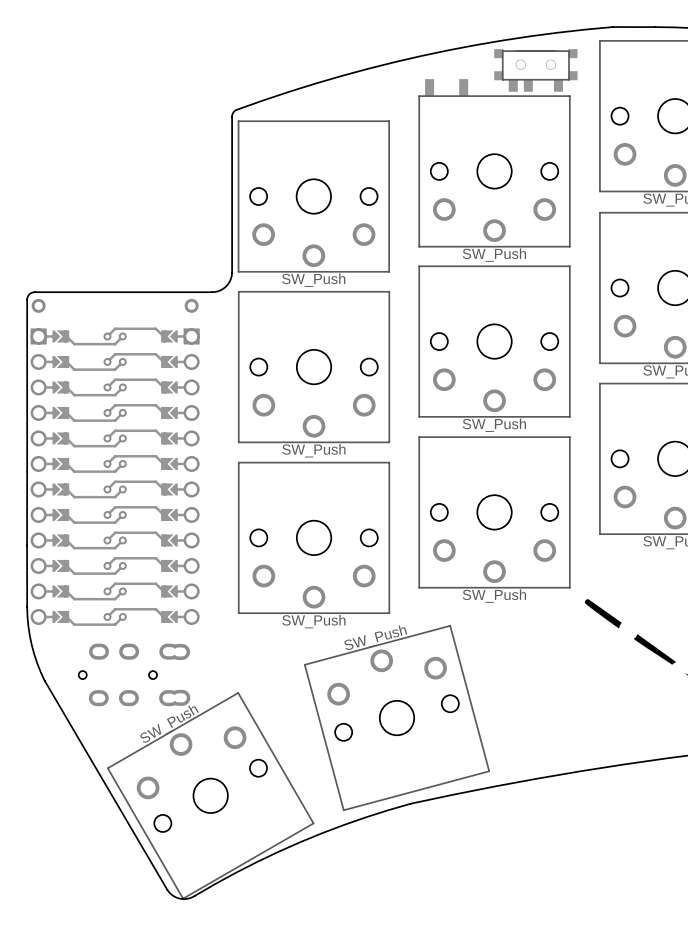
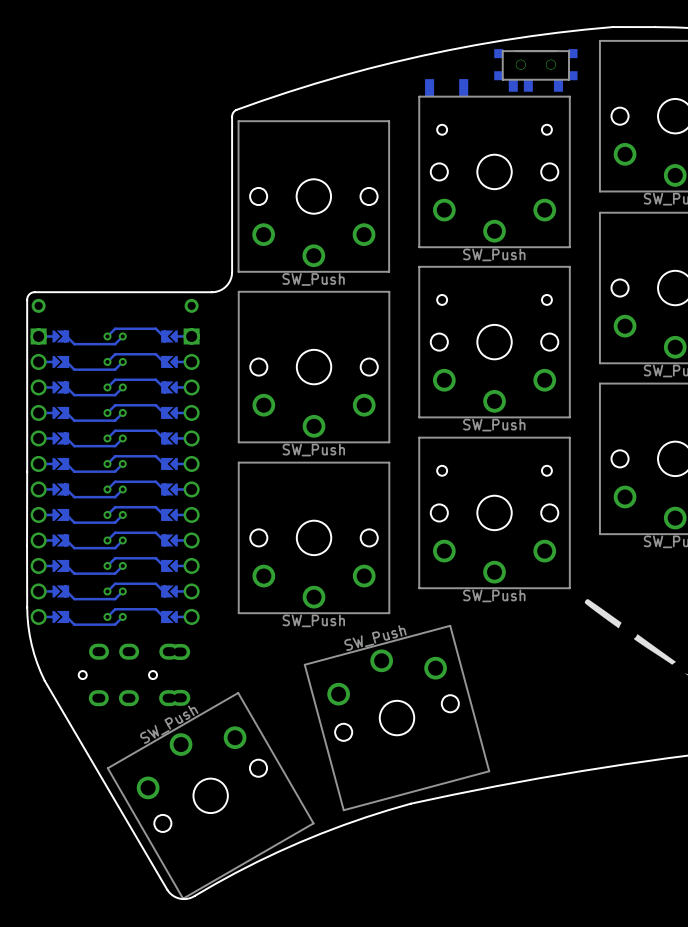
part footprint: [418, 95, 571, 248] -> [418, 95, 571, 248]
part footprint: [418, 265, 571, 418] -> [418, 266, 571, 419]
part footprint: [418, 436, 571, 589] -> [418, 436, 571, 589]

